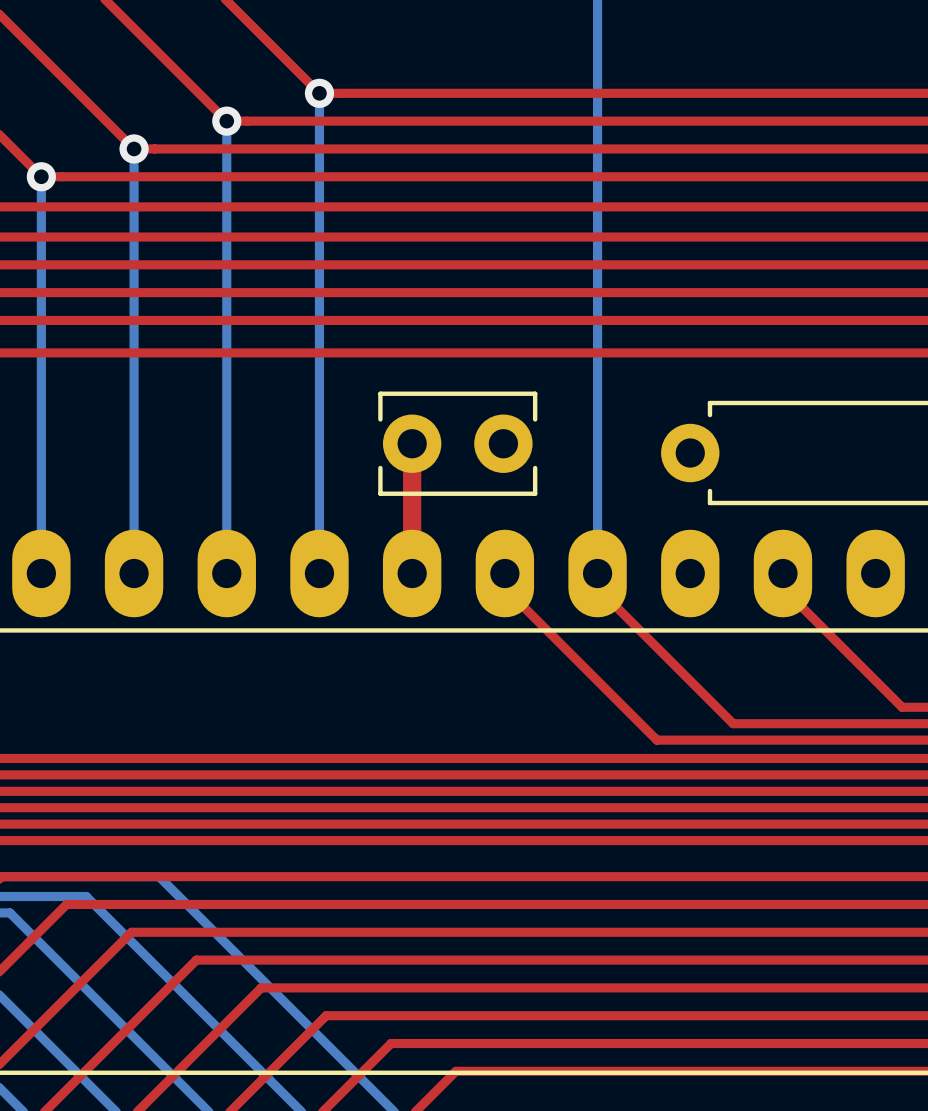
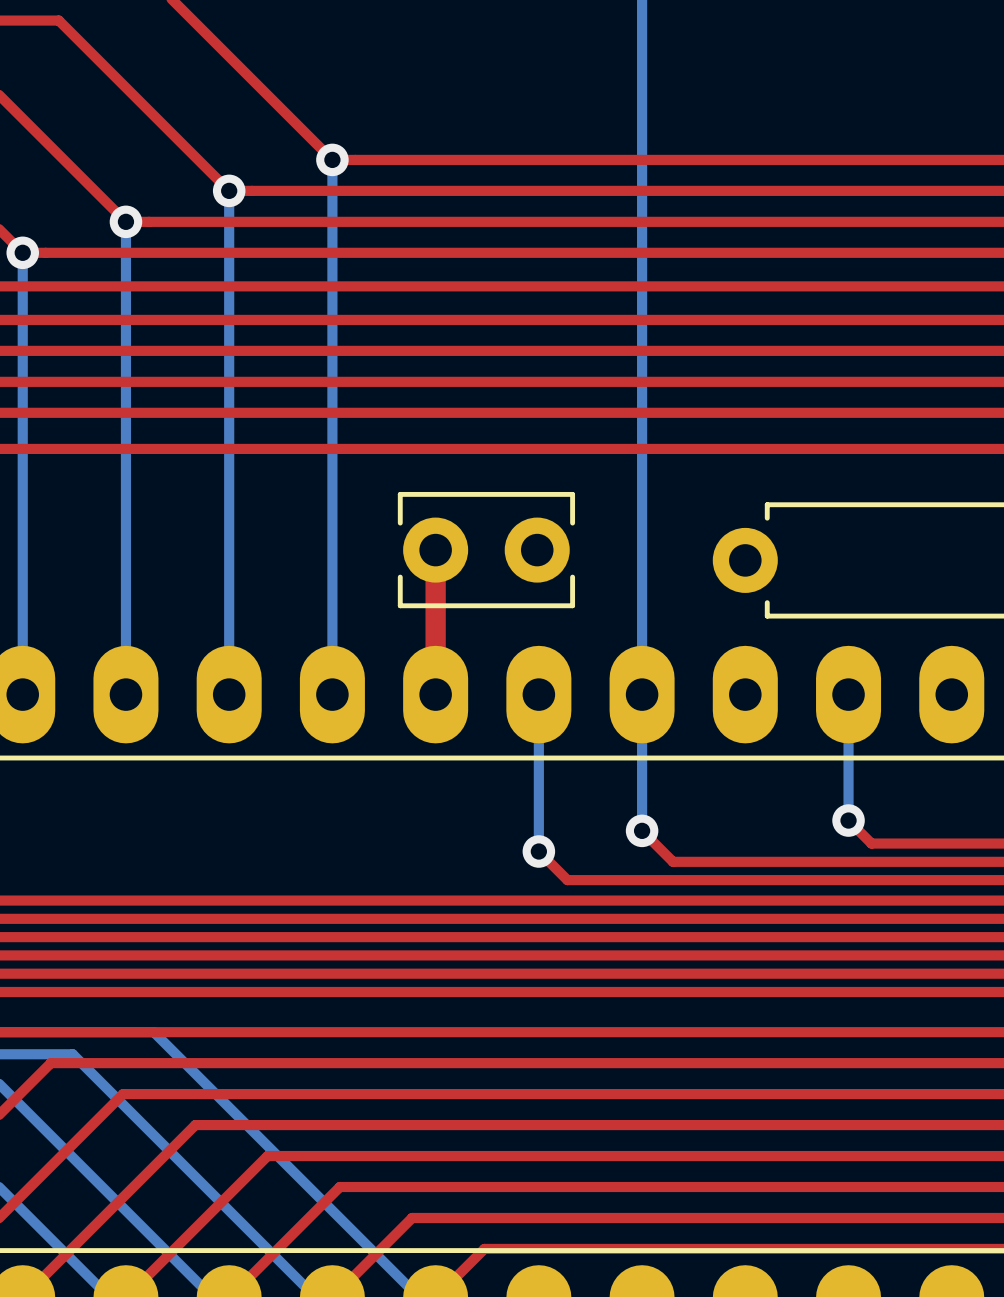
bottom track: none -> (538, 694) (538, 851)
top track: (504, 573) (504, 588) (656, 740) -> (538, 851) (567, 880) (708, 880)
bottom track: none -> (642, 694) (642, 830)
top track: (597, 573) (597, 588) (733, 723) -> (642, 830) (673, 861) (793, 861)
bottom track: none -> (848, 694) (848, 820)
top track: (782, 573) (782, 588) (902, 707) -> (848, 820) (871, 843) (981, 843)
via: none -> (848, 820)
via: none -> (642, 830)
via: none -> (538, 851)

